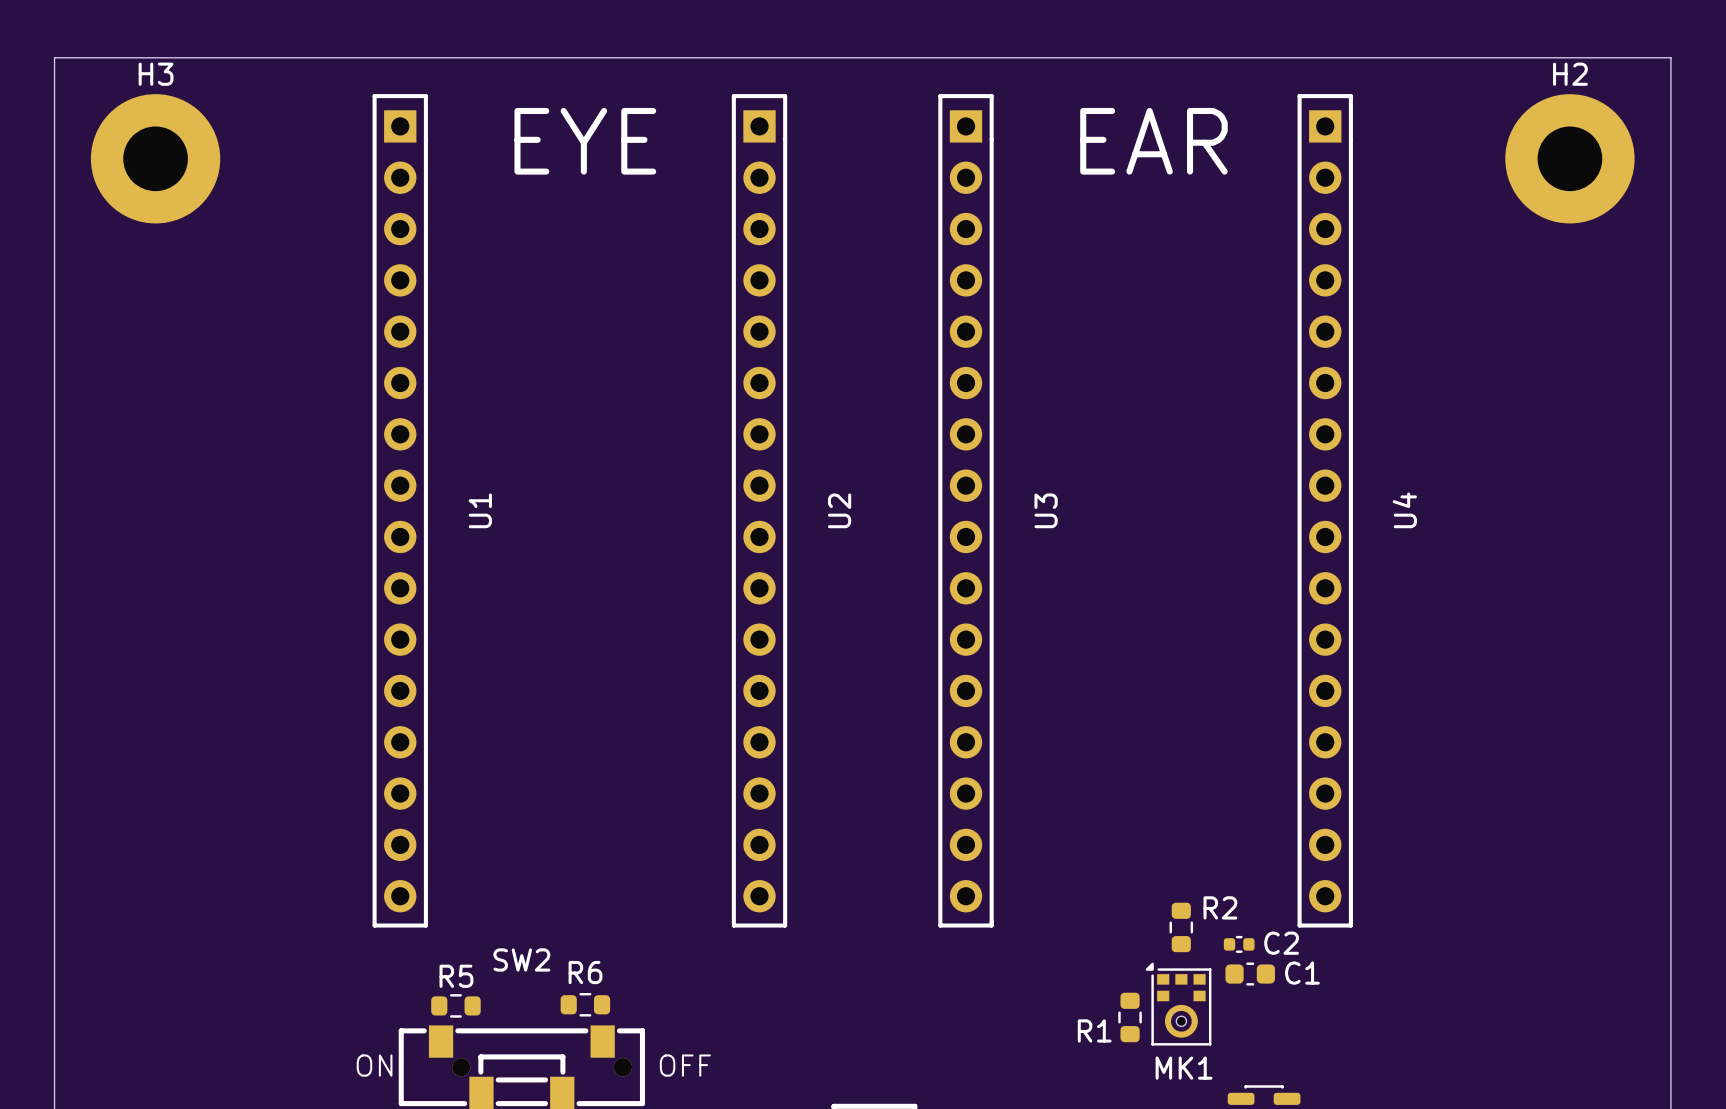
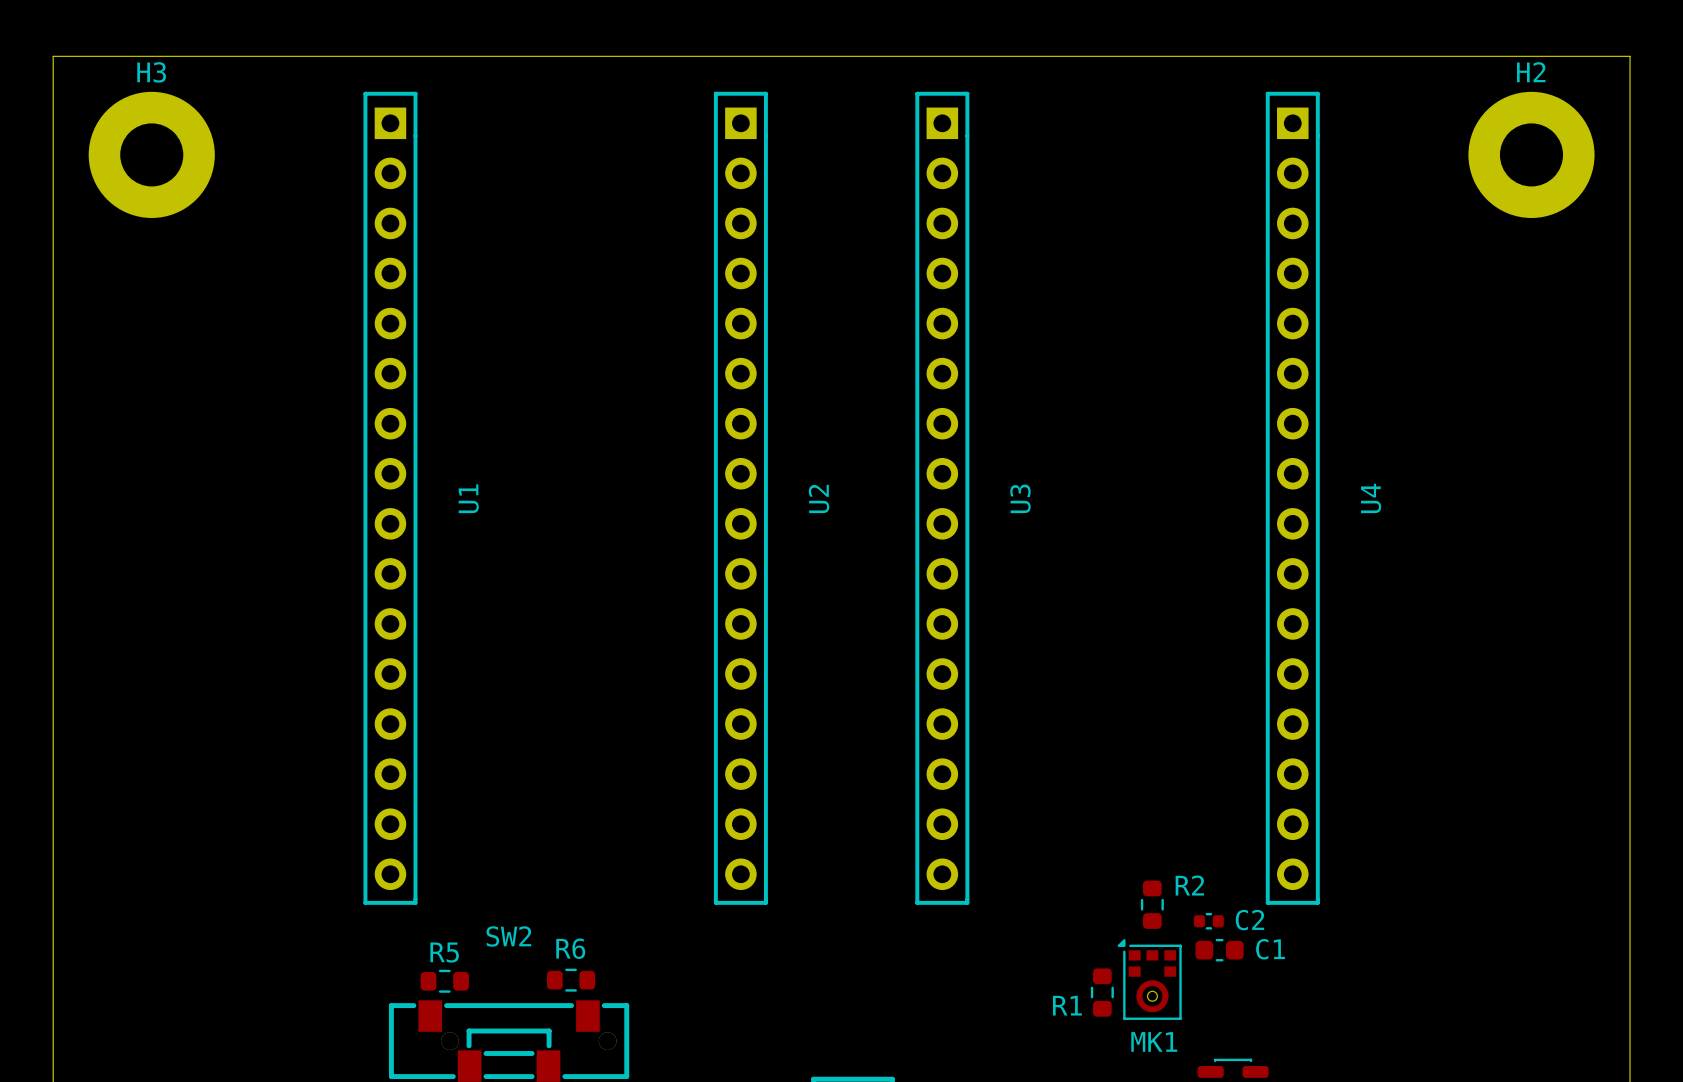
text: EYE (585, 141) -> none
text: EAR (1153, 141) -> none
text: ON (374, 1065) -> none
text: OFF (685, 1065) -> none

